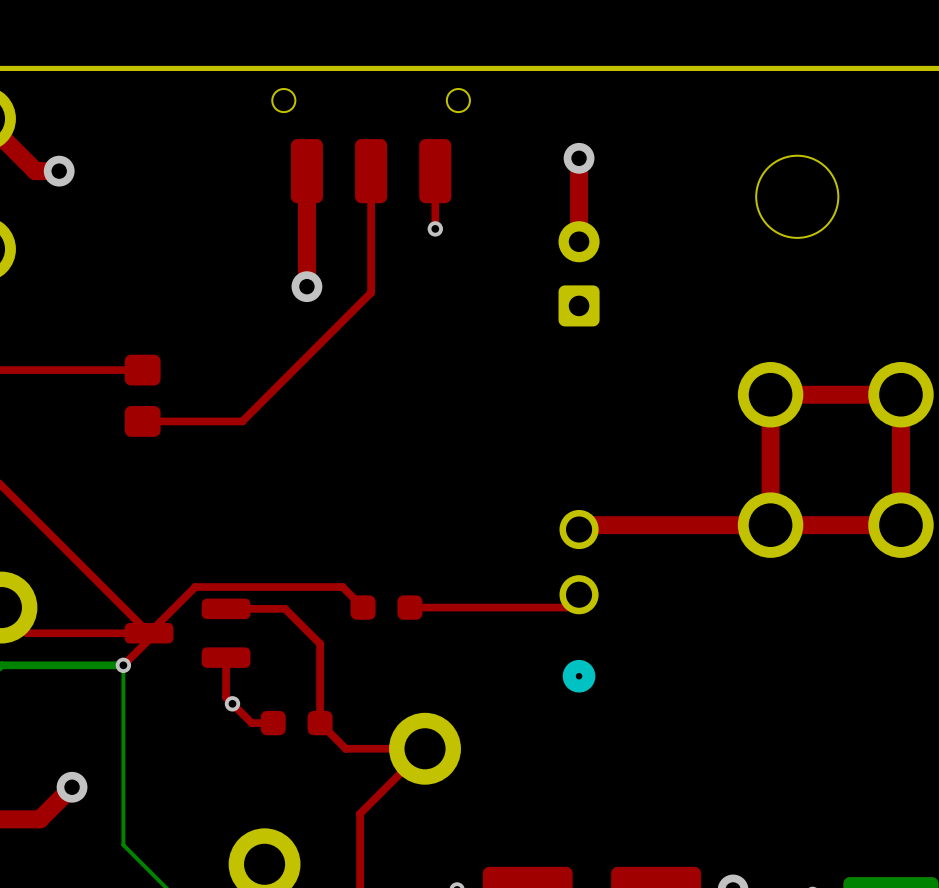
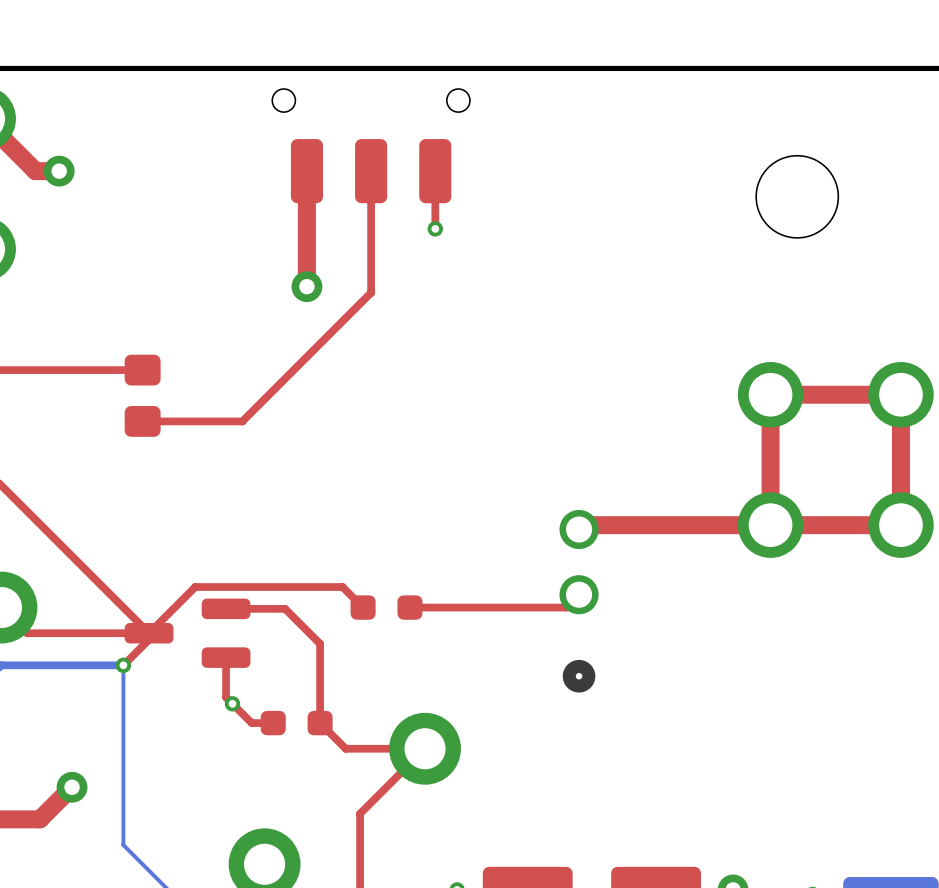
top track: (579, 158) (579, 241) -> none
via: (579, 158) -> none
part: (579, 273) -> none

